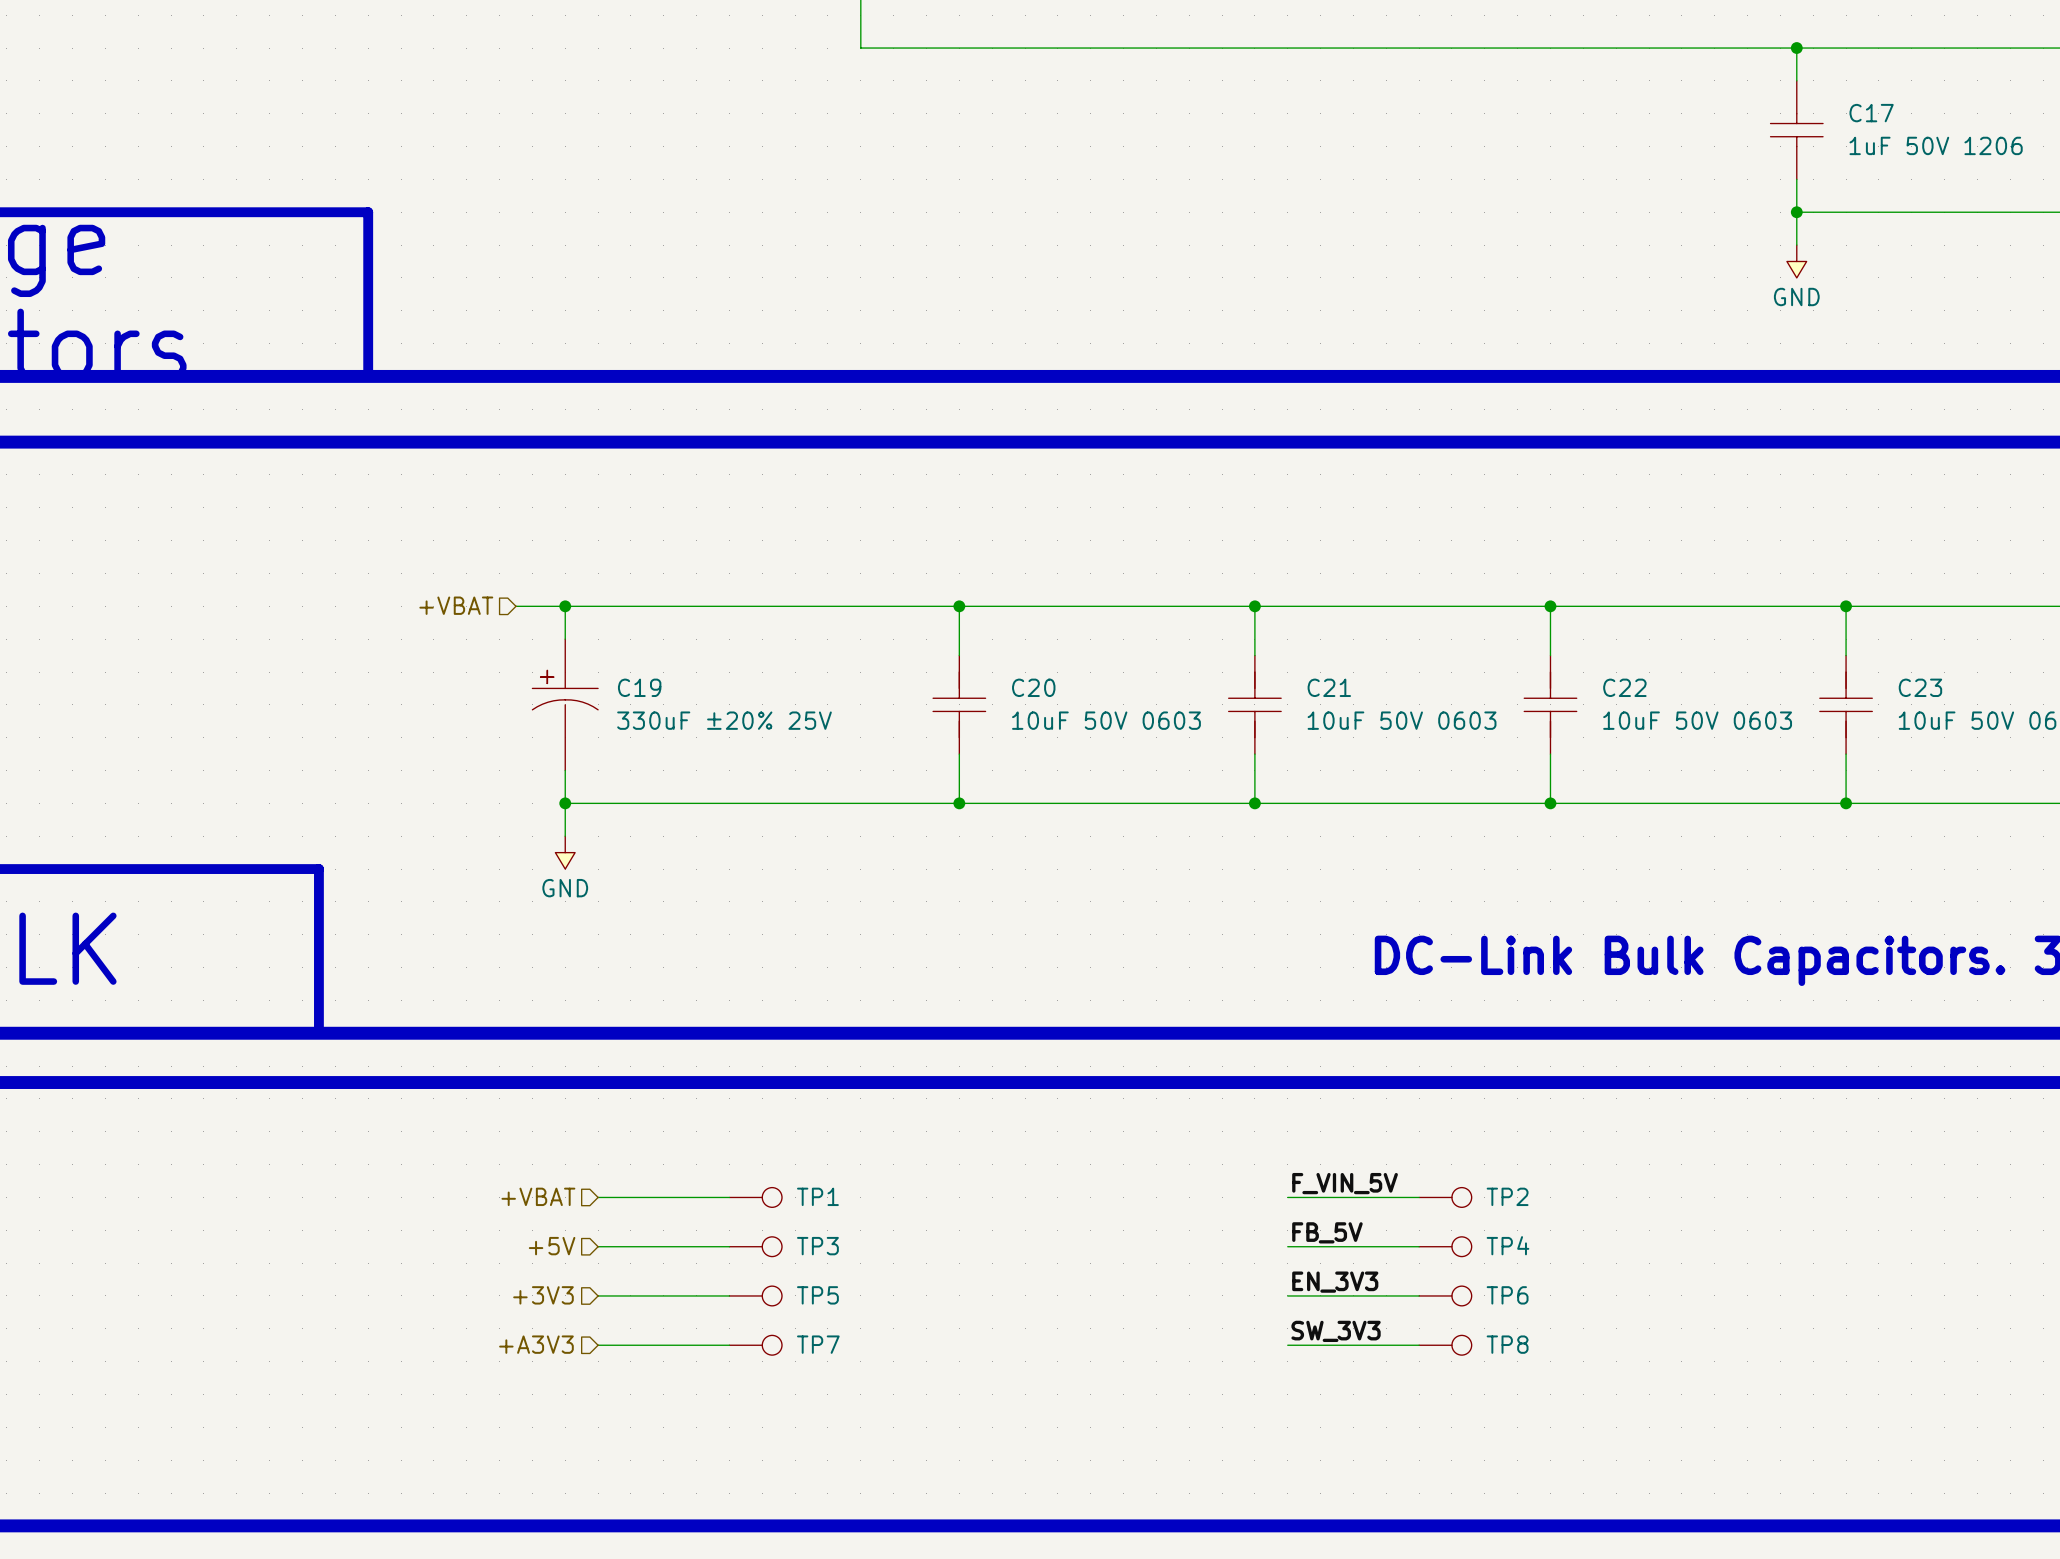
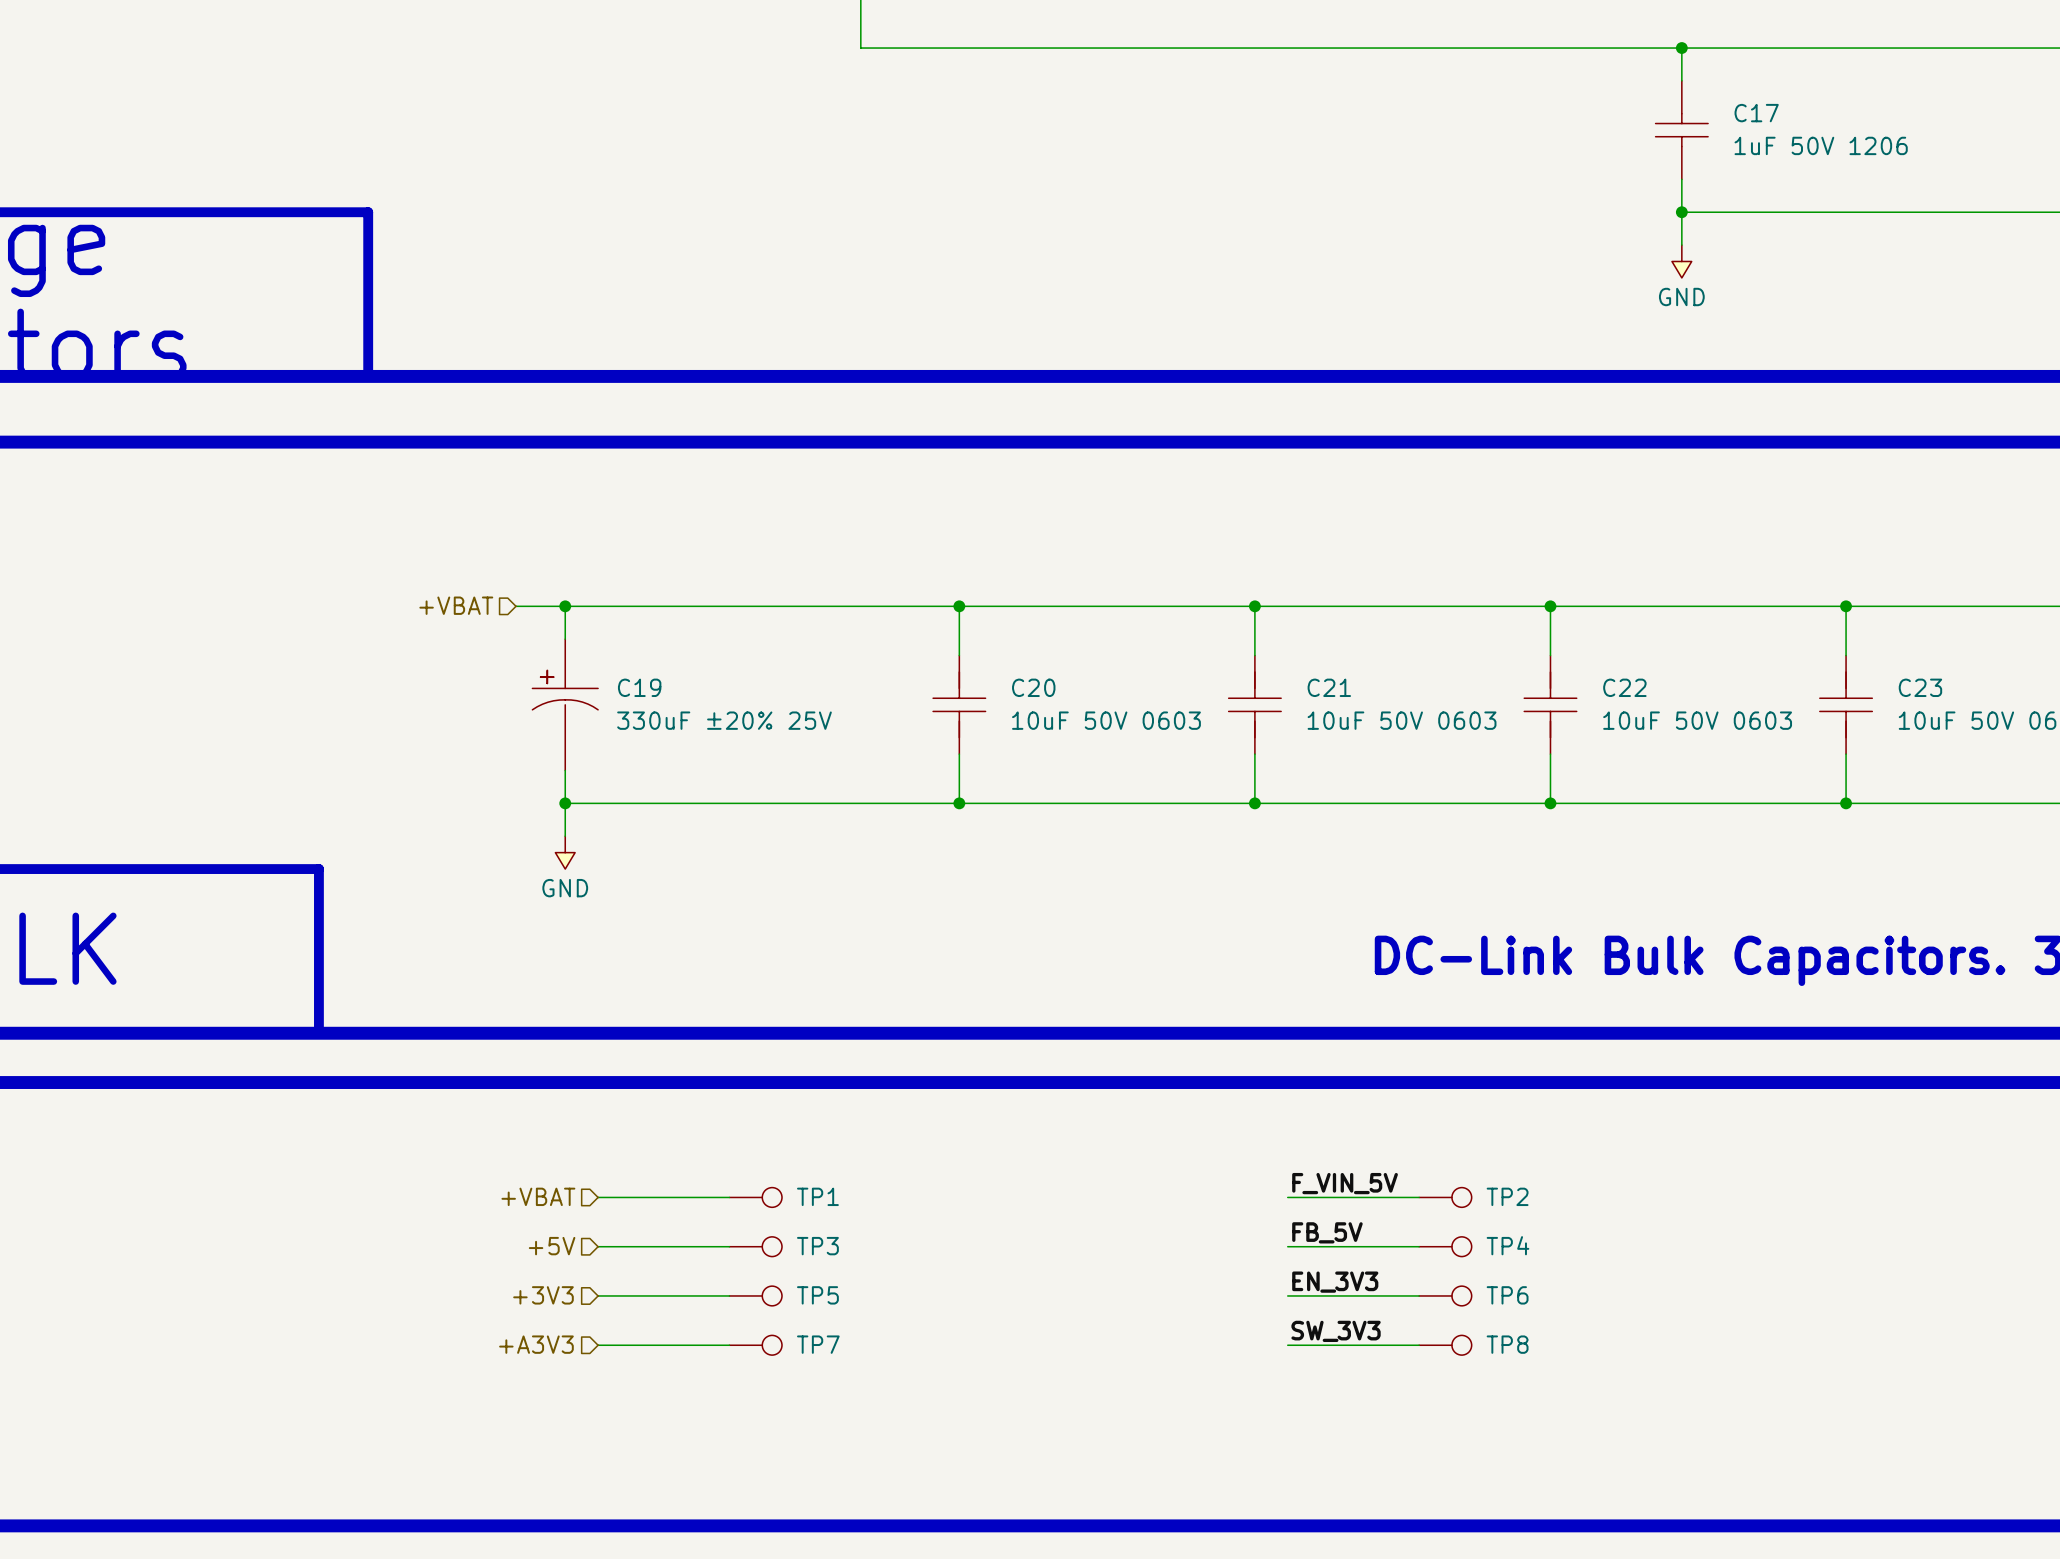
junction: none -> (1681, 48)
wire: (1796, 48) (1796, 80) -> (1681, 48) (1681, 80)
junction: (1796, 48) -> none
C17 position: (1796, 130) -> (1681, 130)
wire: (1796, 179) (1796, 245) -> (1681, 179) (1681, 245)
wire: none -> (1681, 212) (1796, 212)
junction: none -> (1681, 212)
junction: (1796, 212) -> none
power symbol position: GND (1796, 261) -> GND (1681, 261)

